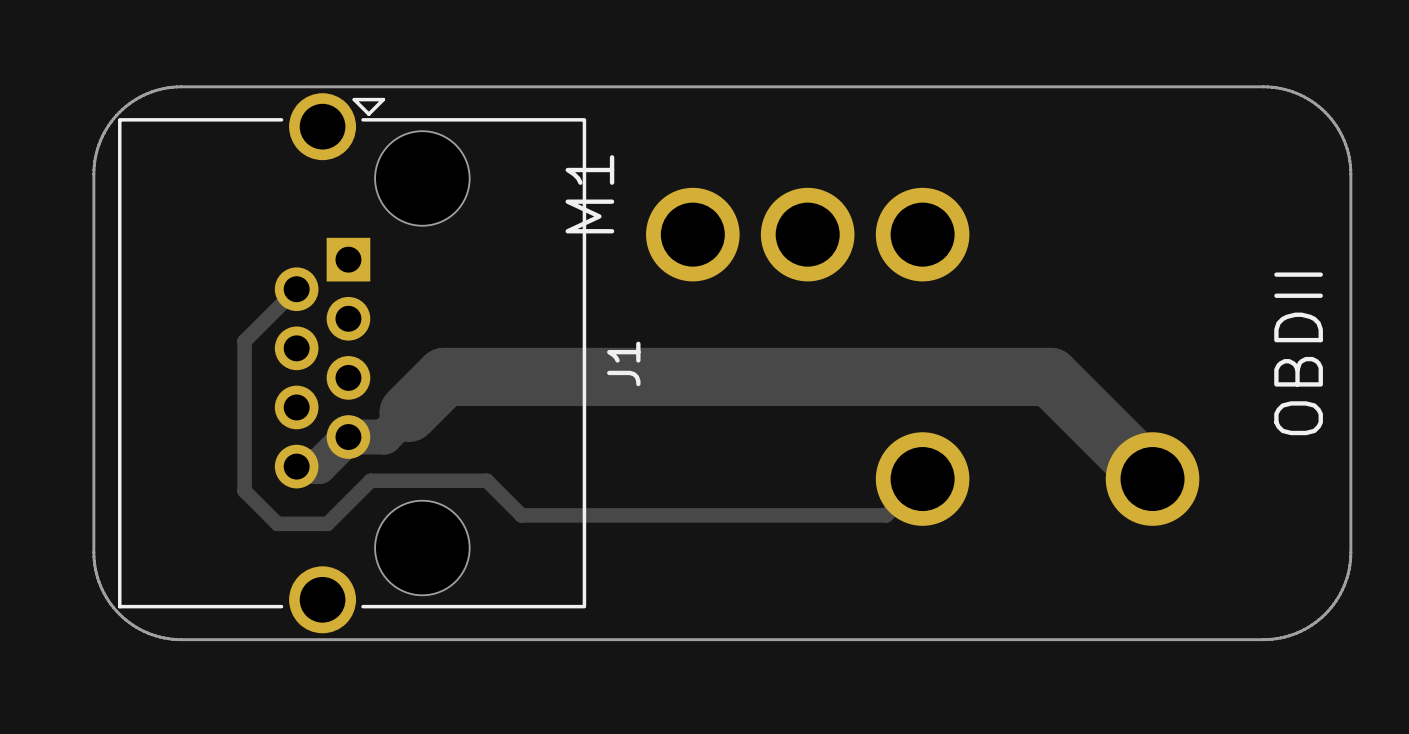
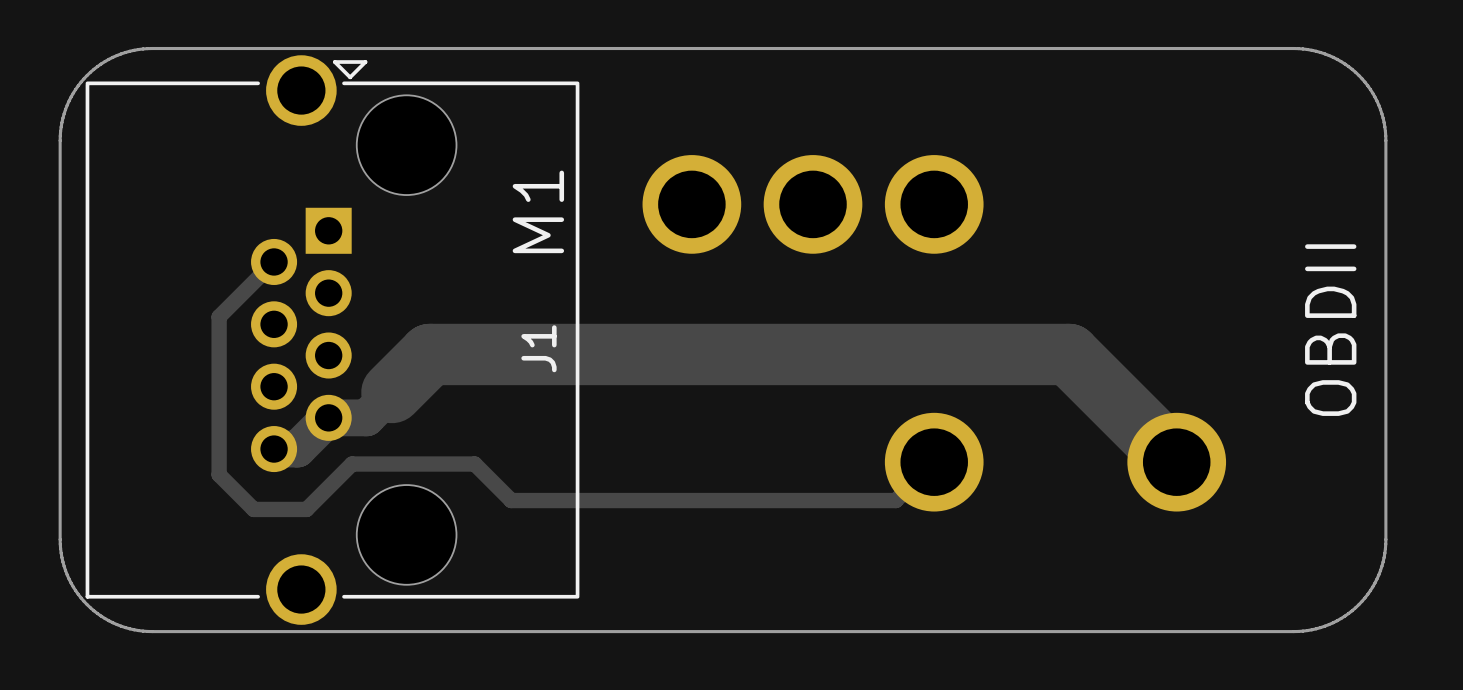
M1 name position: M1 (589, 194) -> M1 (538, 211)
J1 name position: J1 (623, 363) -> J1 (538, 348)

